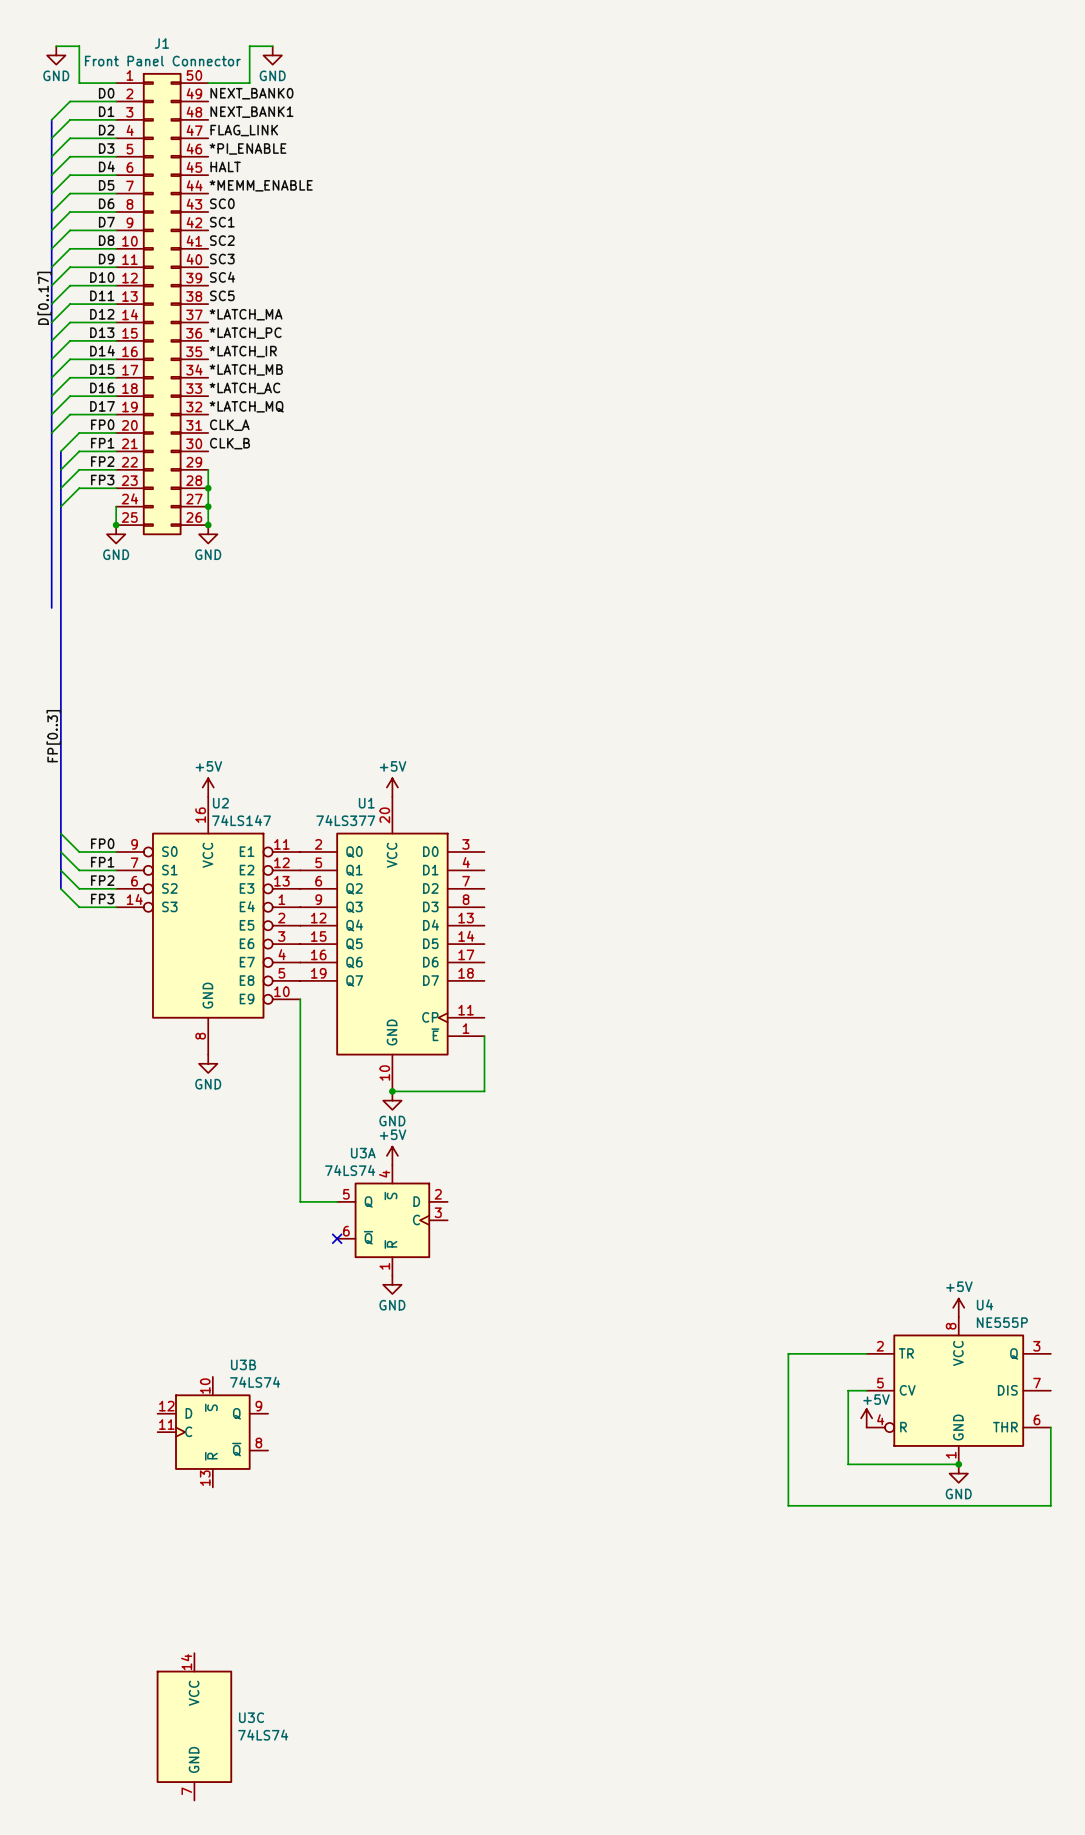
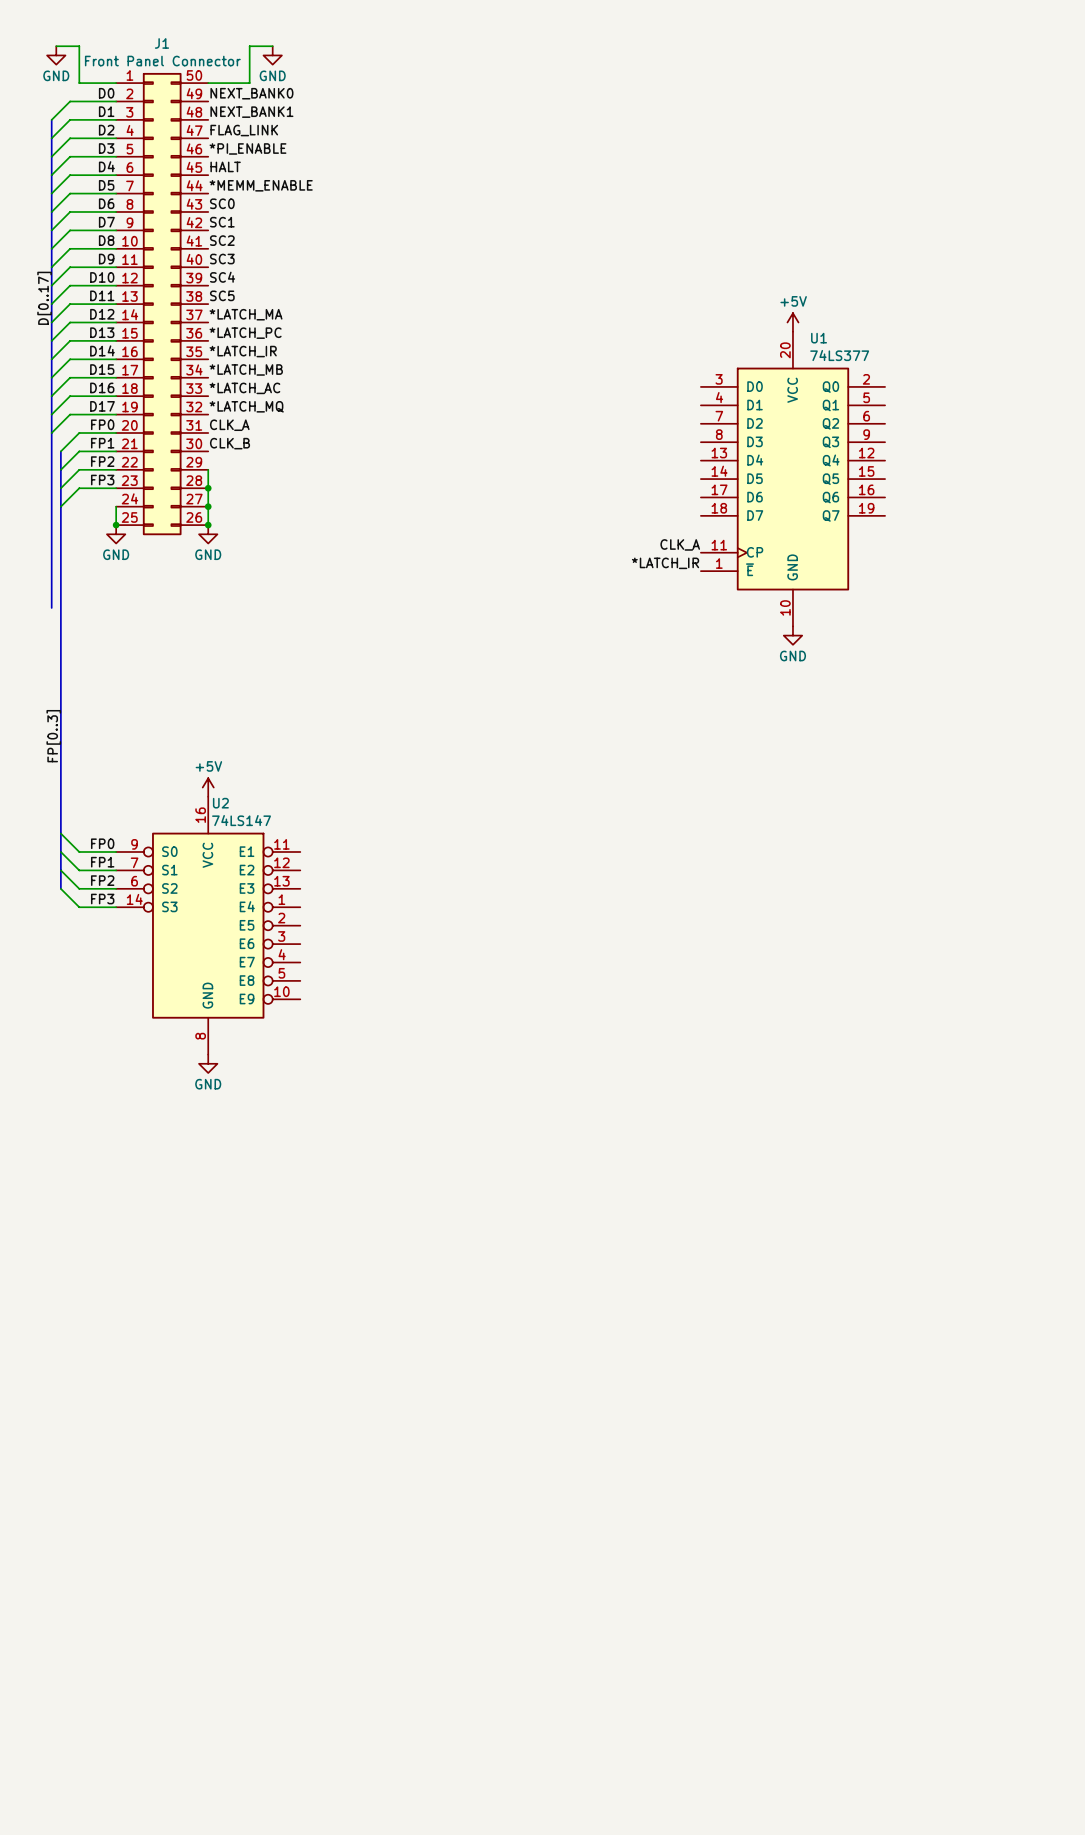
power symbol: none -> +5V (792, 322)
label: none -> CLK_A (680, 544)
label: none -> *LATCH_IR (665, 563)
power symbol: none -> GND (792, 635)
power symbol: +5V (392, 787) -> none
U1 flip: as is (392, 944) -> left-right (792, 479)
U1 position: (392, 944) -> (792, 479)
wire: (300, 999) (300, 1201) (337, 1201) -> none
wire: (484, 1036) (484, 1091) (392, 1091) -> none
junction: (392, 1091) -> none
power symbol: GND (392, 1100) -> none
power symbol: +5V (392, 1155) -> none
U3A: 74LS74 (392, 1220) -> none
no-connect mark: (337, 1238) -> none
power symbol: GND (392, 1284) -> none
power symbol: +5V (958, 1307) -> none
wire: (866, 1353) (788, 1353) (788, 1505) (1050, 1505) (1050, 1427) -> none
wire: (866, 1390) (848, 1390) (848, 1464) (958, 1464) -> none
U4: NE555P (958, 1390) -> none
power symbol: +5V (866, 1418) -> none
U3B: 74LS74 (212, 1432) -> none
junction: (958, 1464) -> none
power symbol: GND (958, 1473) -> none
U3C: 74LS74 (194, 1726) -> none

